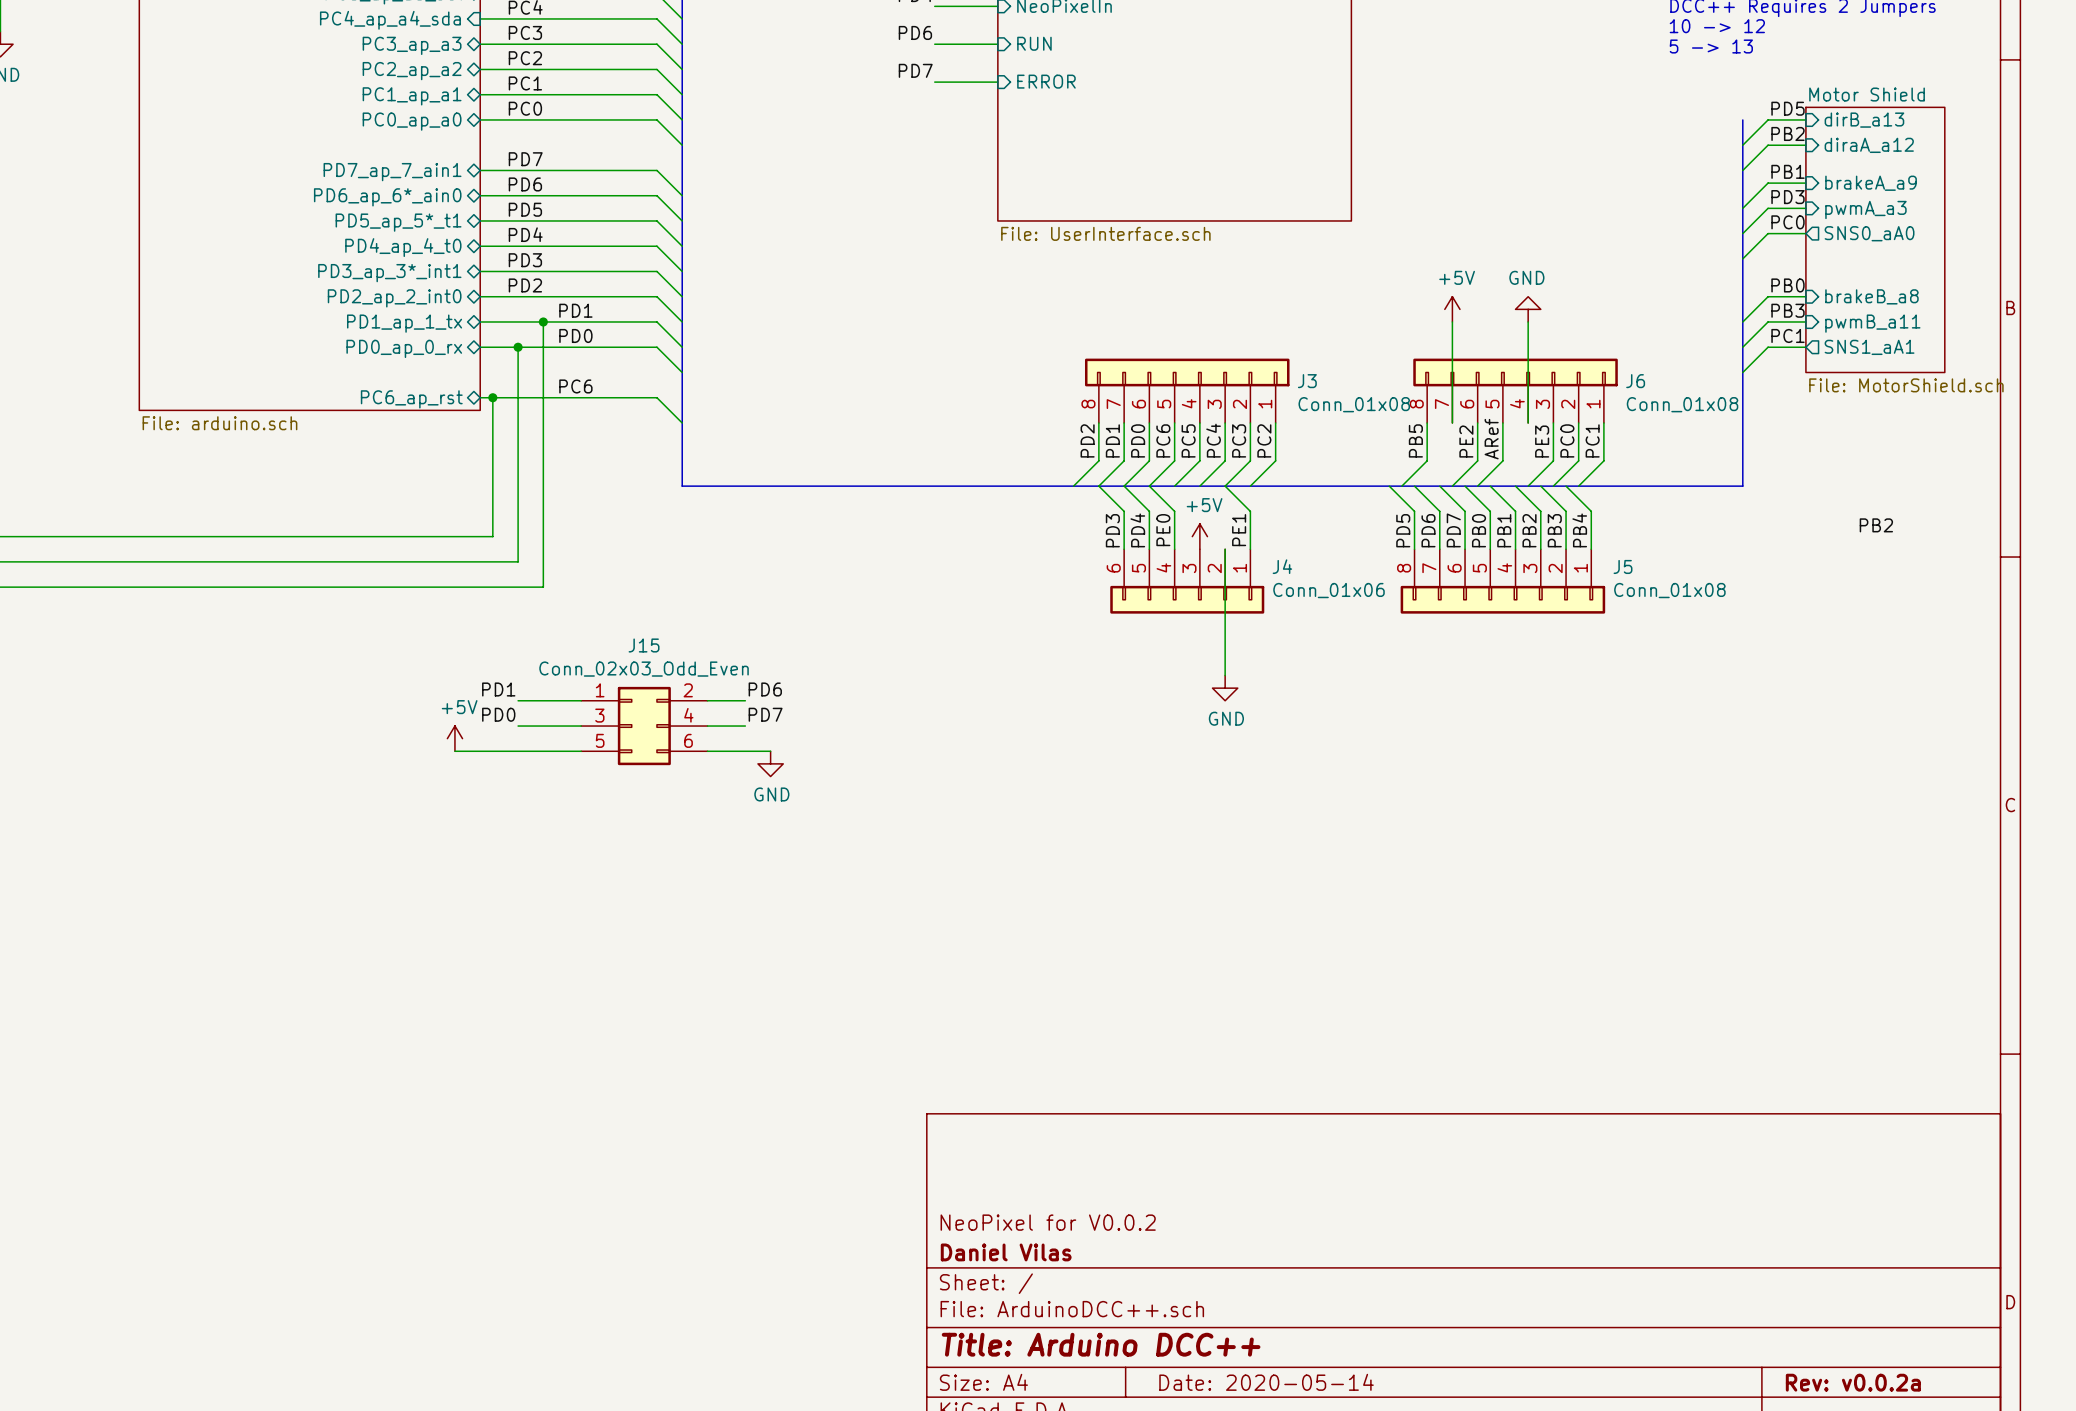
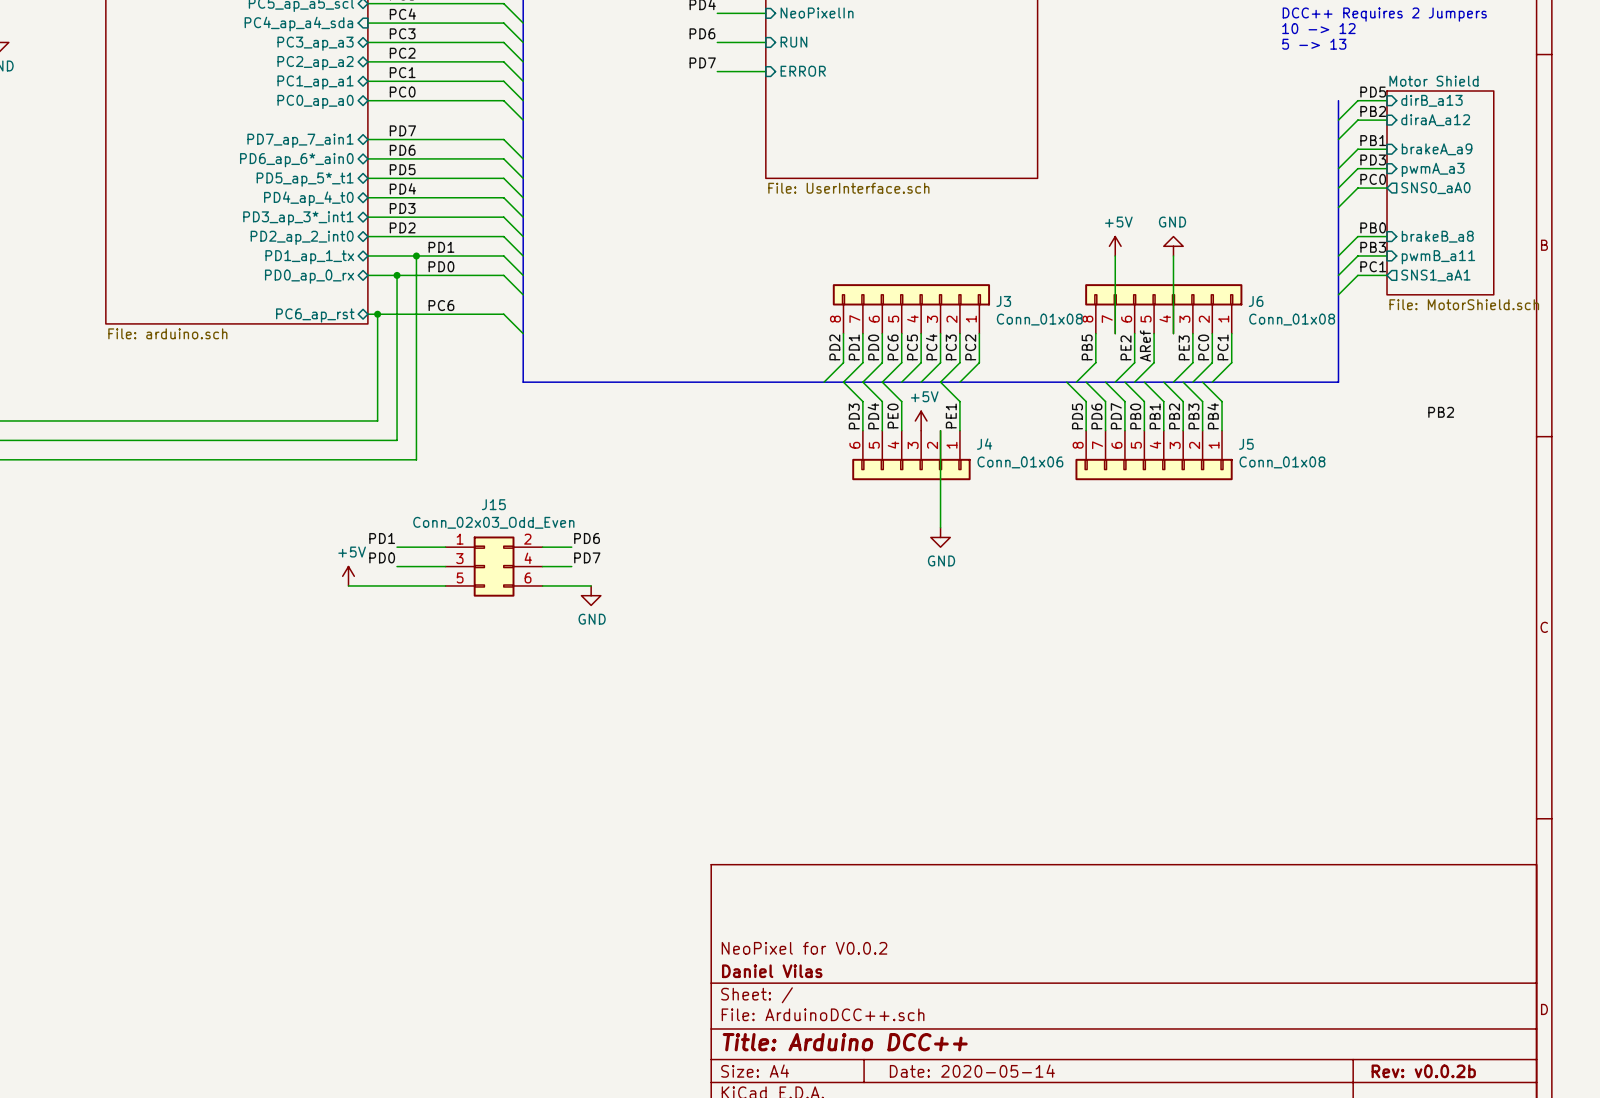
title block: Rev: v0.0.2a (1853, 1382) -> Rev: v0.0.2b (1423, 1071)

